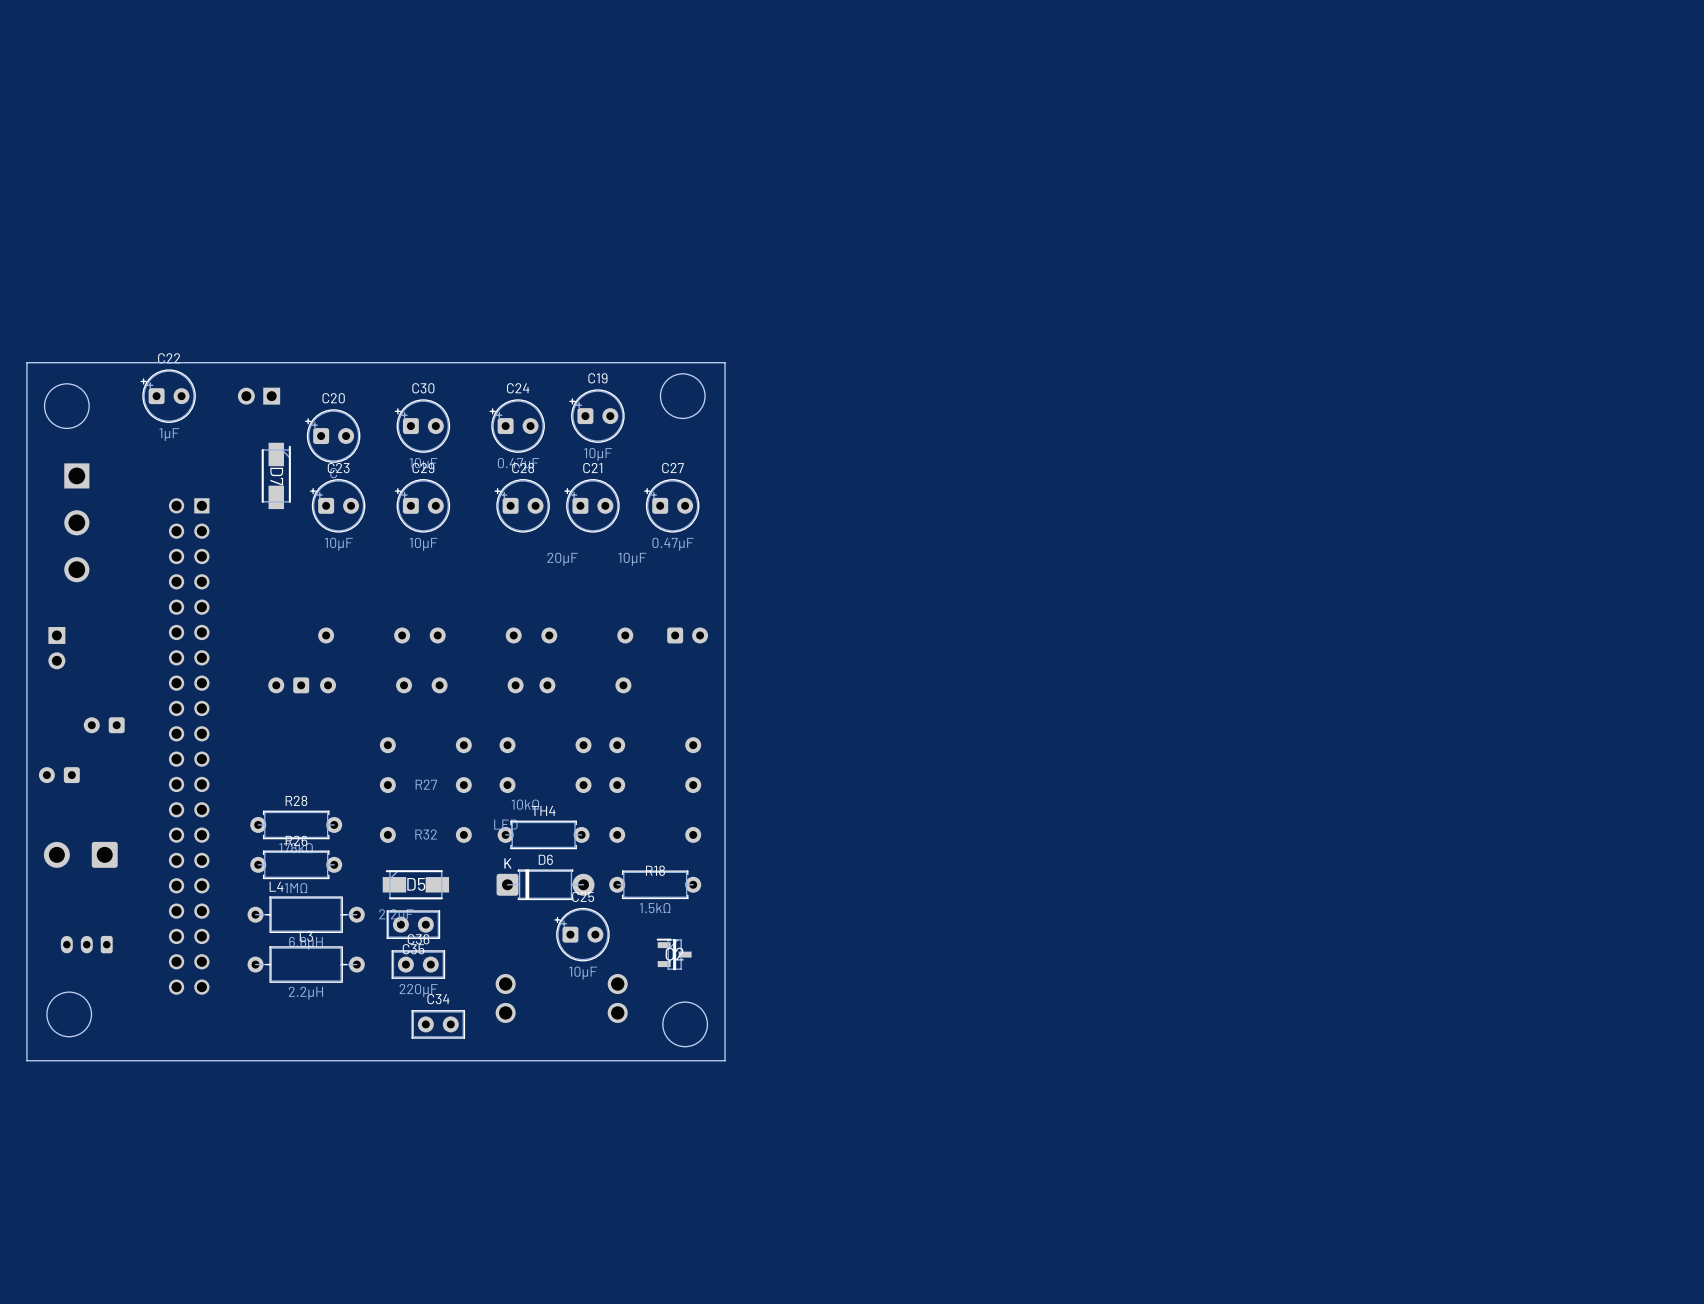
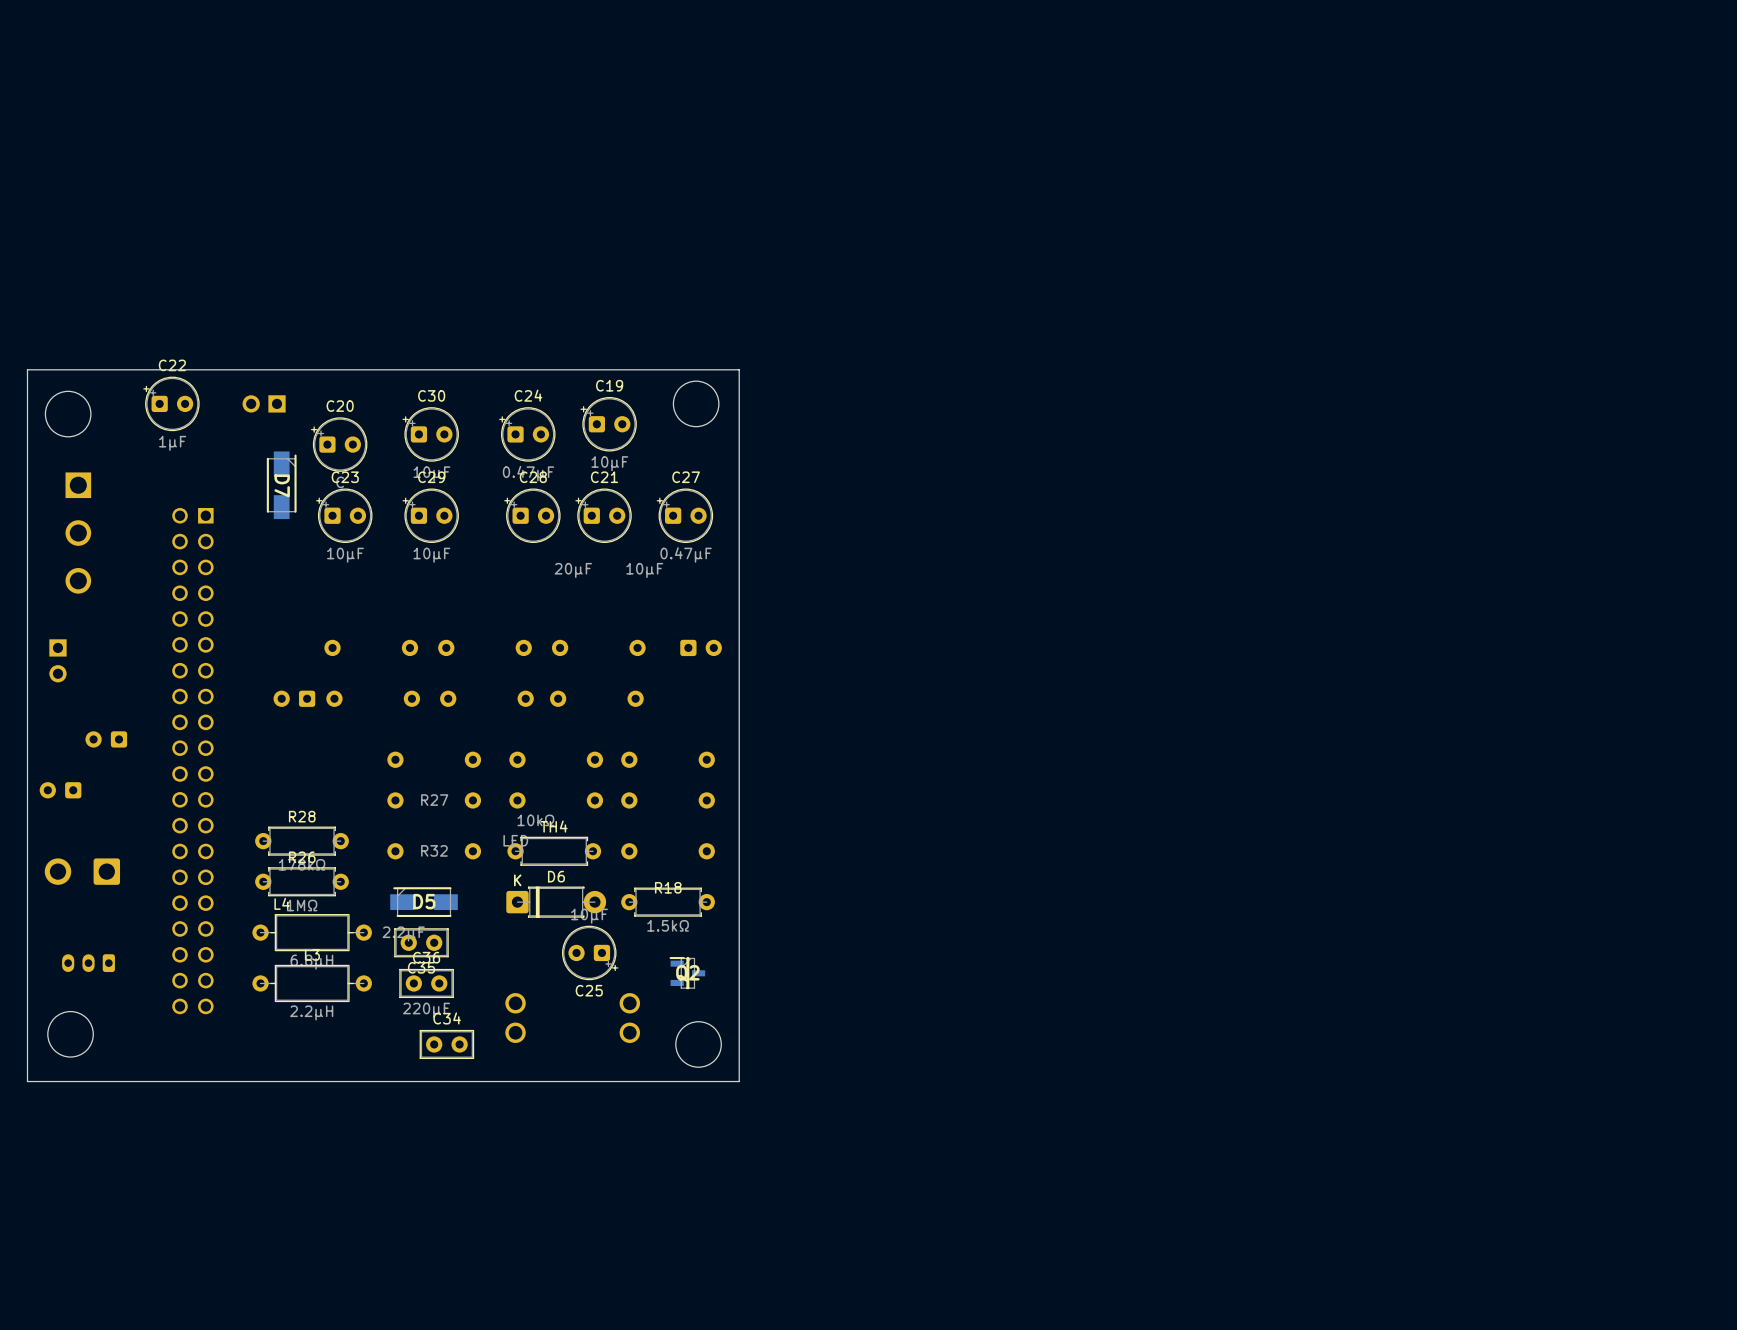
C25 rotation: 0° (581, 934) -> 180° (590, 952)

